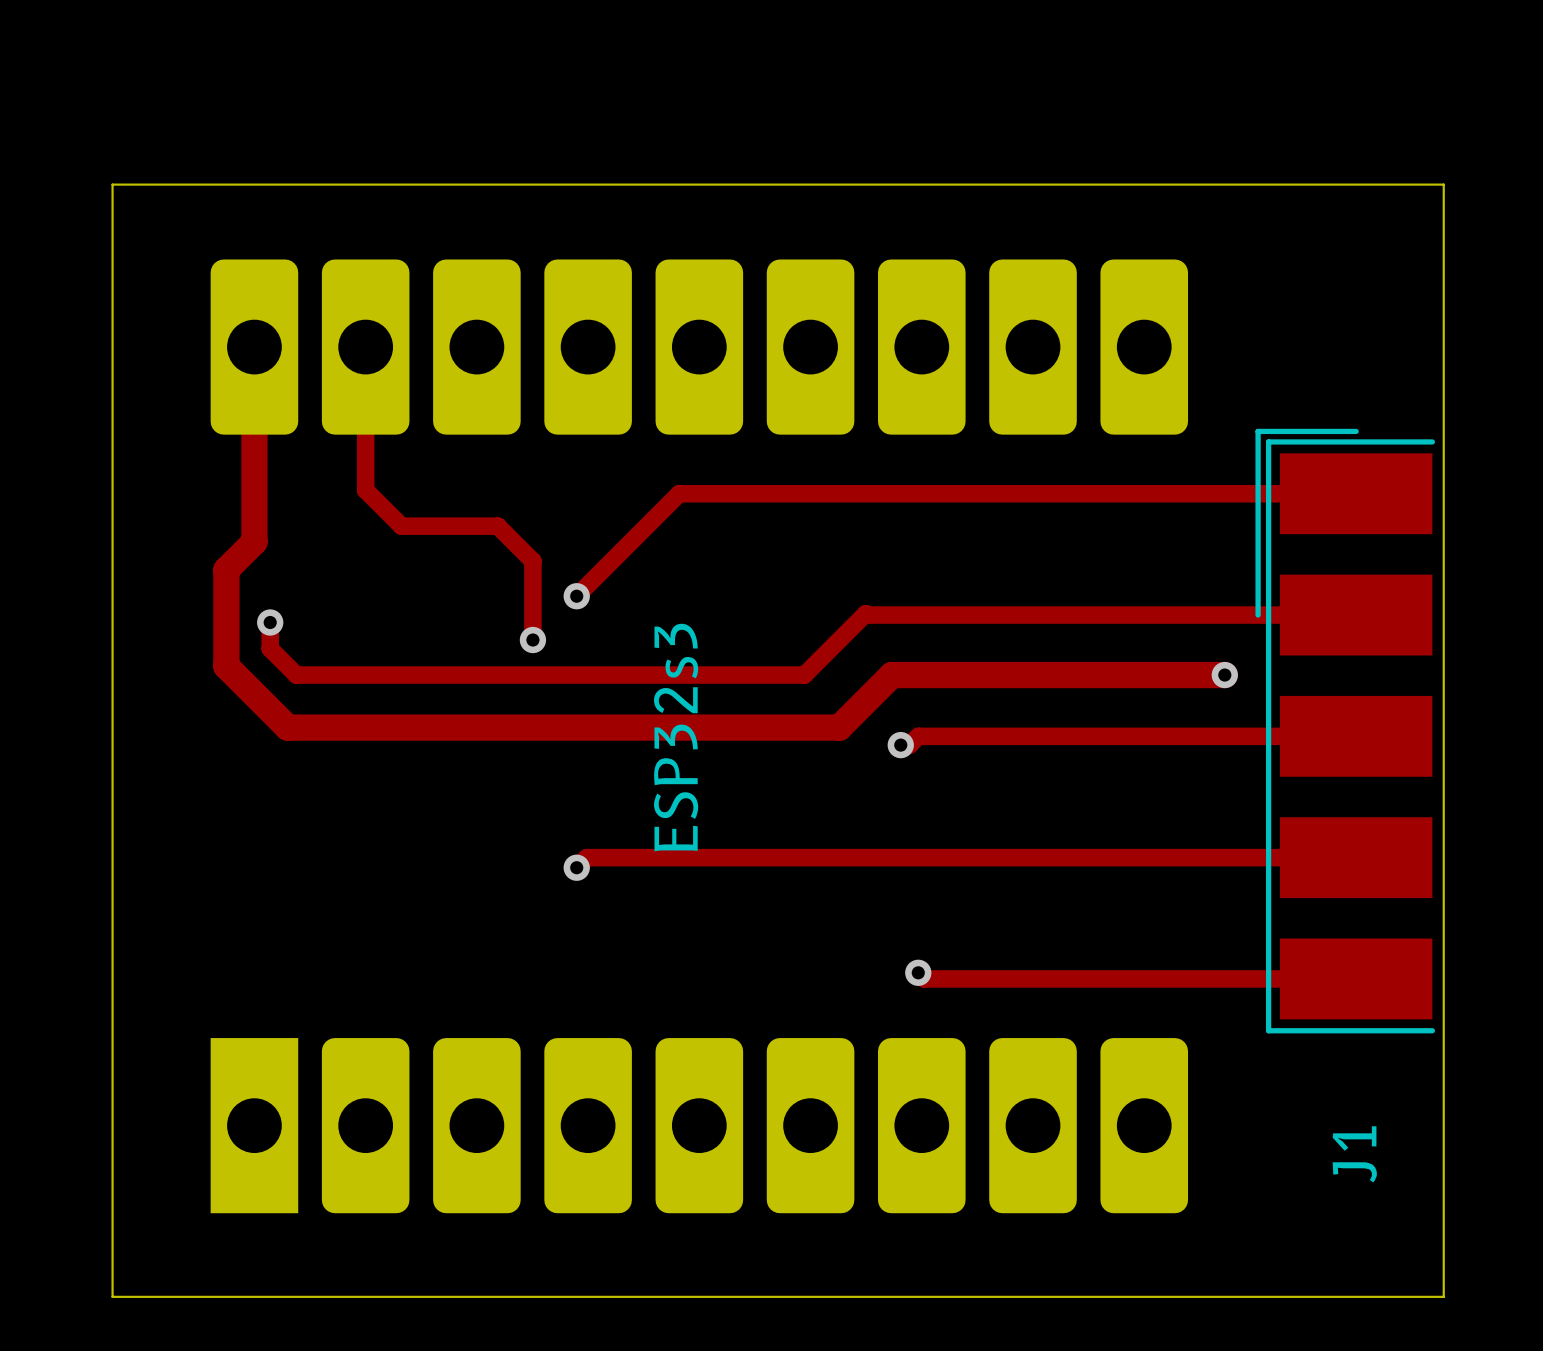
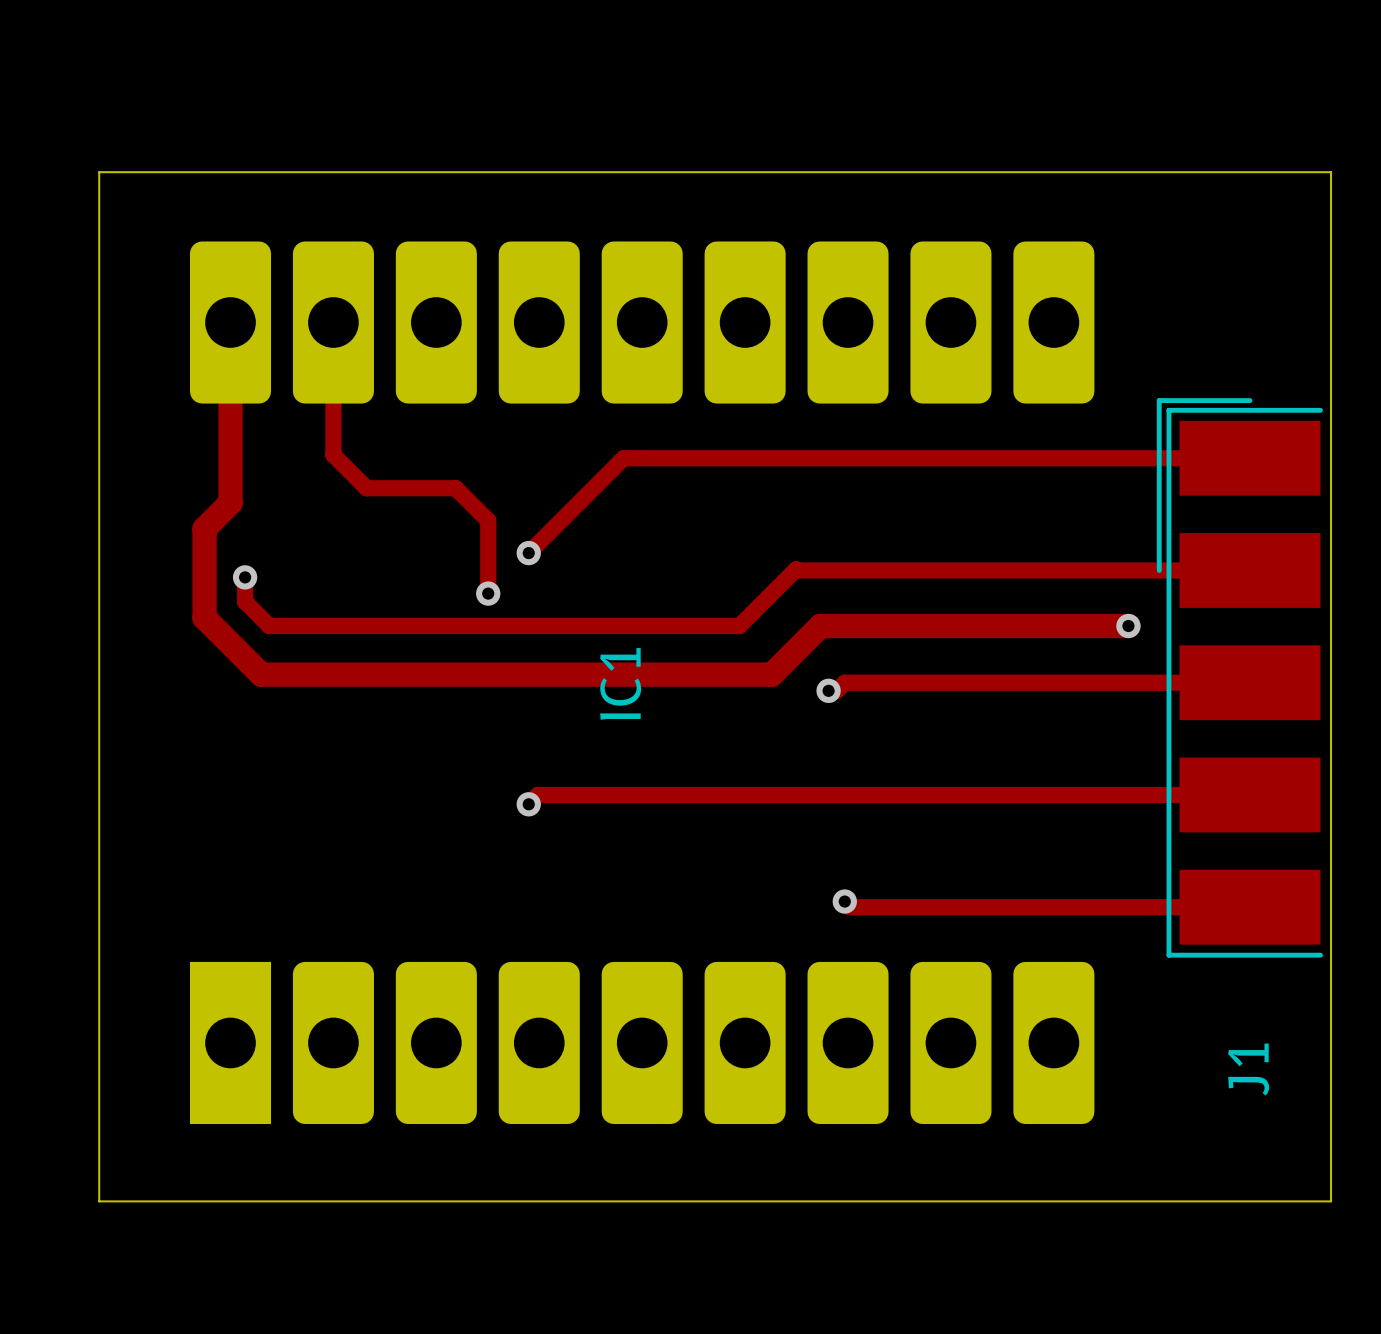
ESP32s3 name: ESP32s3 (676, 737) -> IC1 (620, 683)

